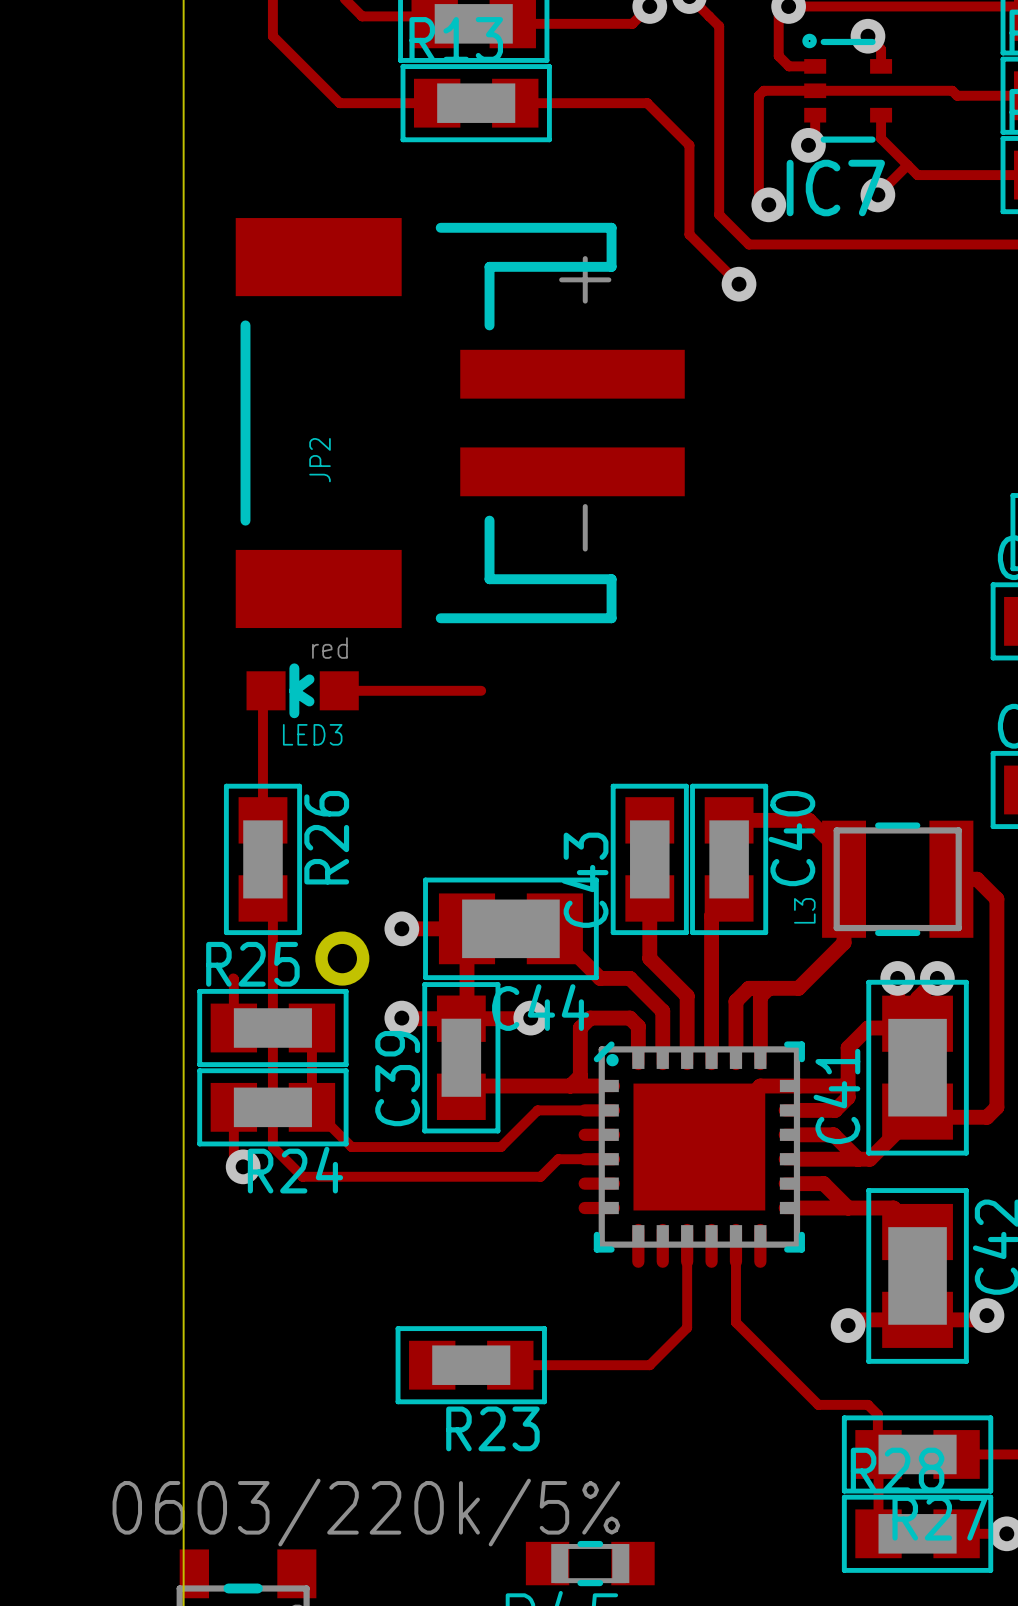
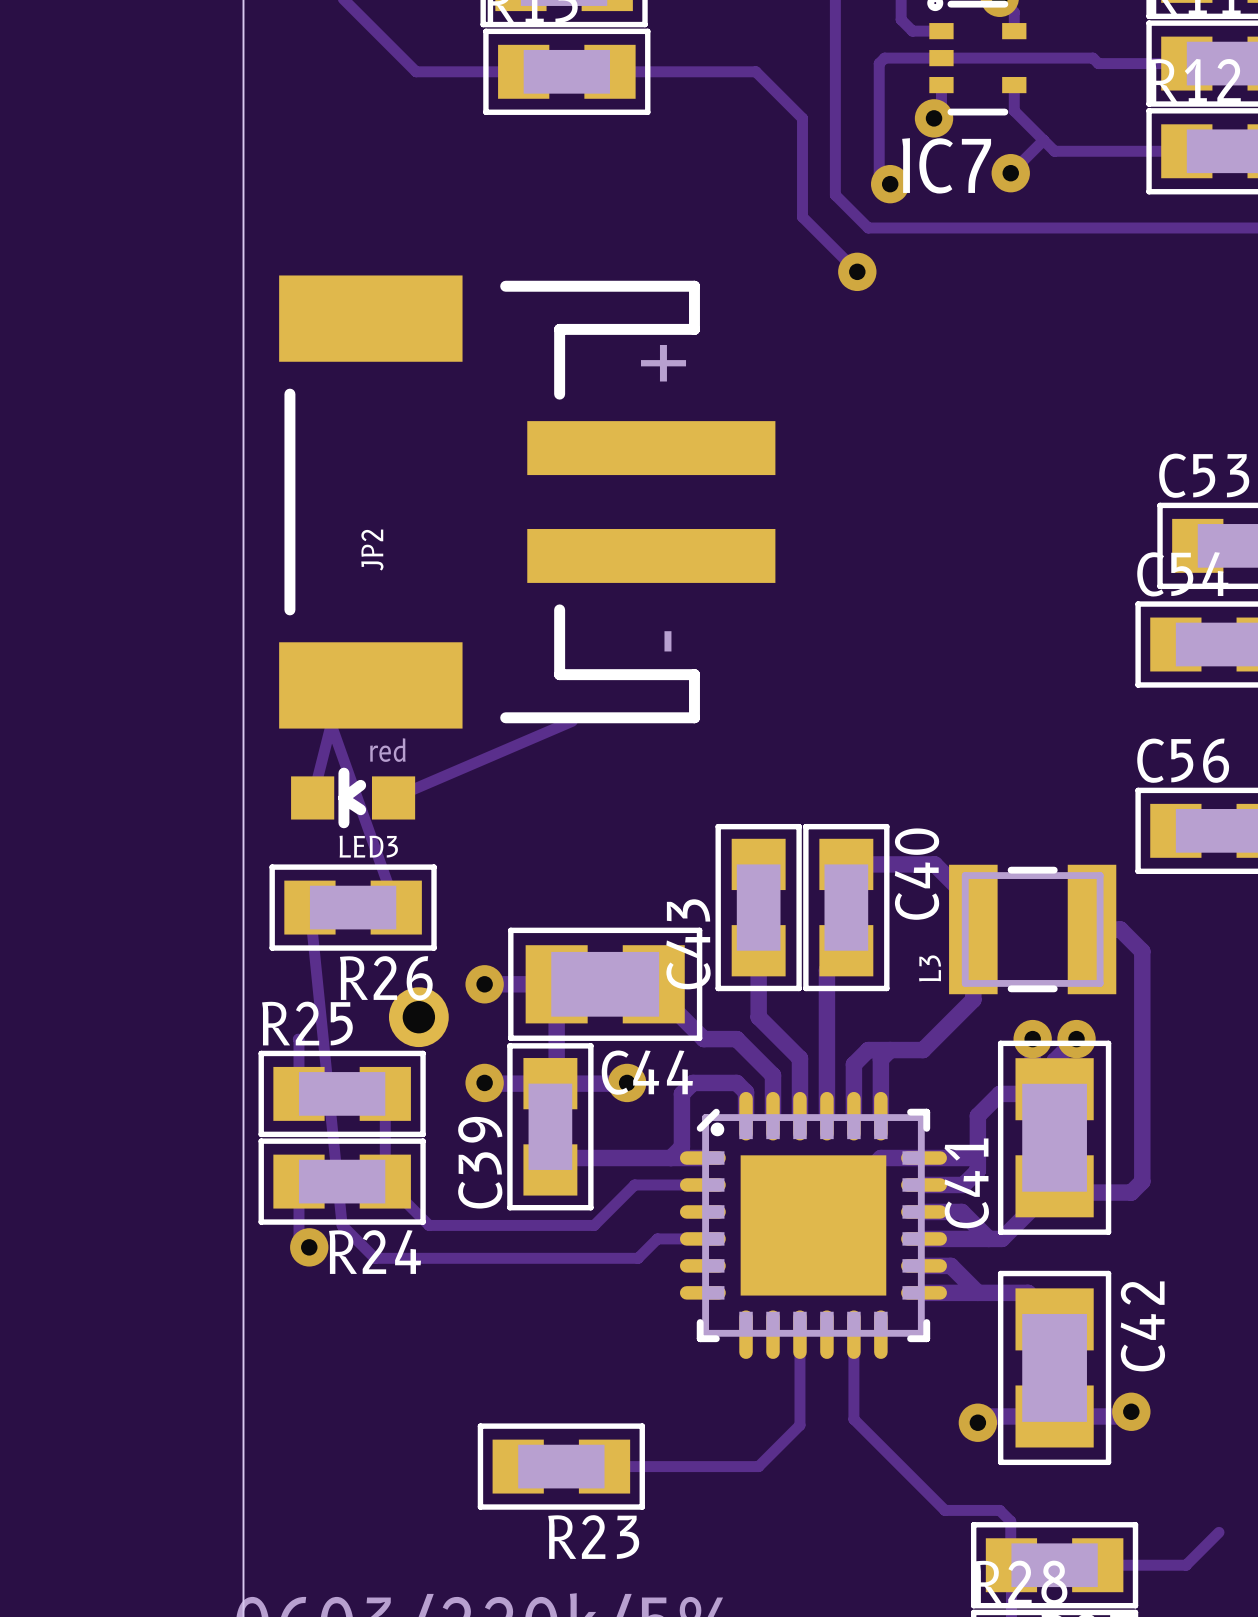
JP2 position: (460, 423) -> (527, 502)
track: (266, 690) (262, 693) (262, 820) -> none
LED3 position: (302, 690) -> (353, 797)
track: (339, 690) (481, 690) -> (393, 797) (572, 721)
track: none -> (312, 797) (331, 724) (396, 907)
R26 rotation: 0° (262, 859) -> 90° clockwise (353, 907)
track: (262, 898) (272, 908) (272, 1147) -> (309, 907) (342, 1225)

